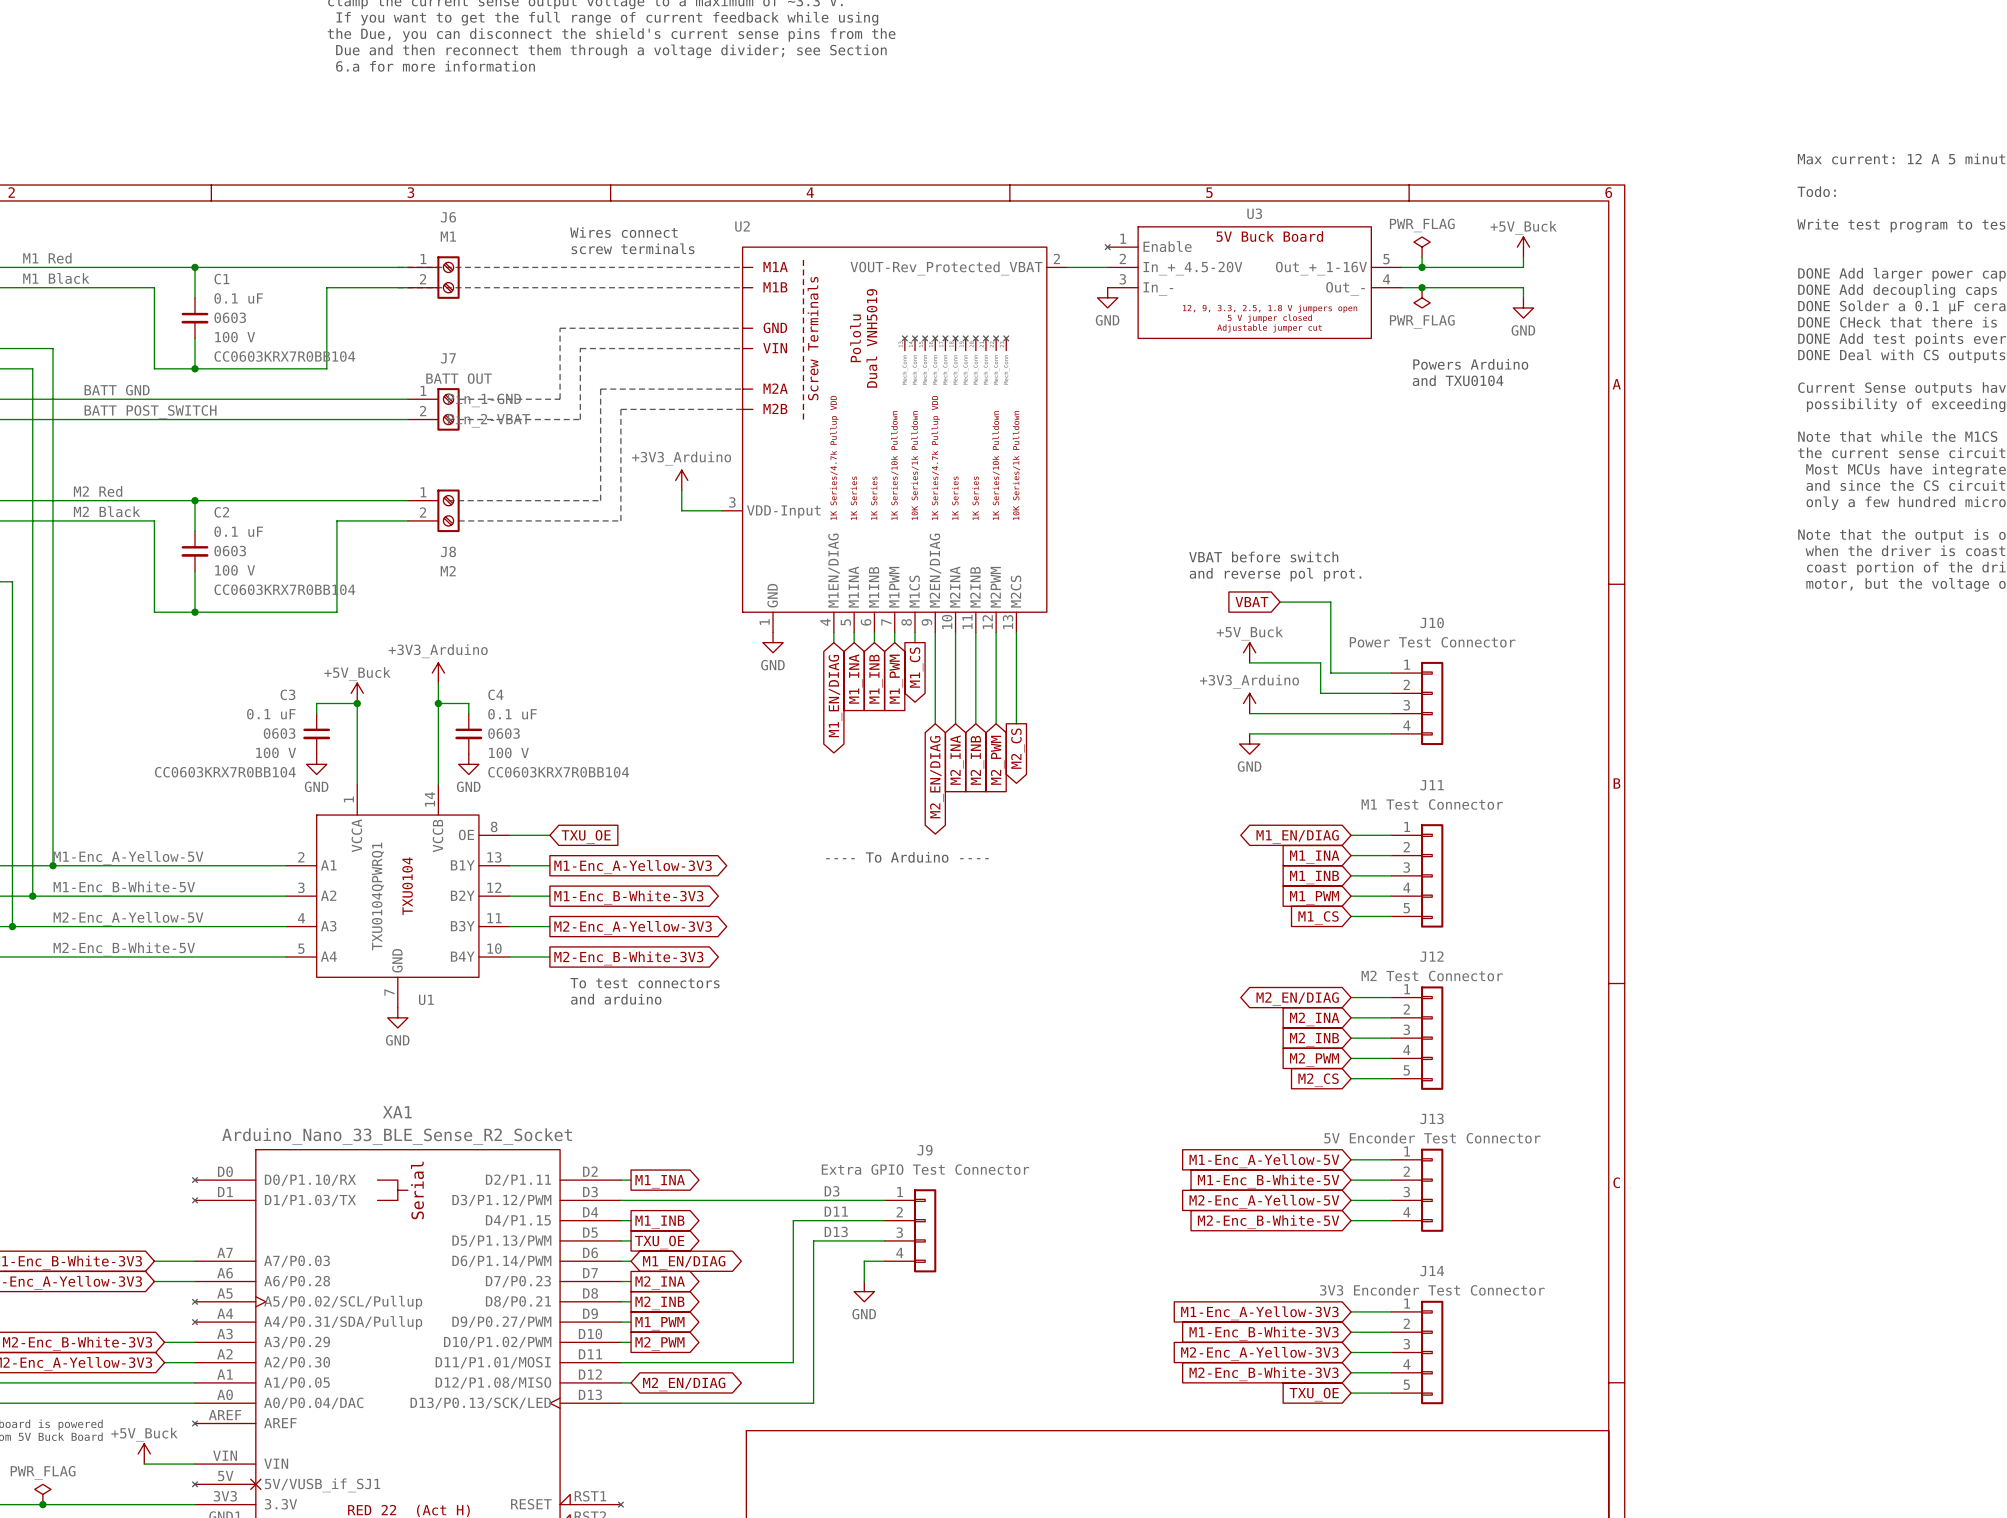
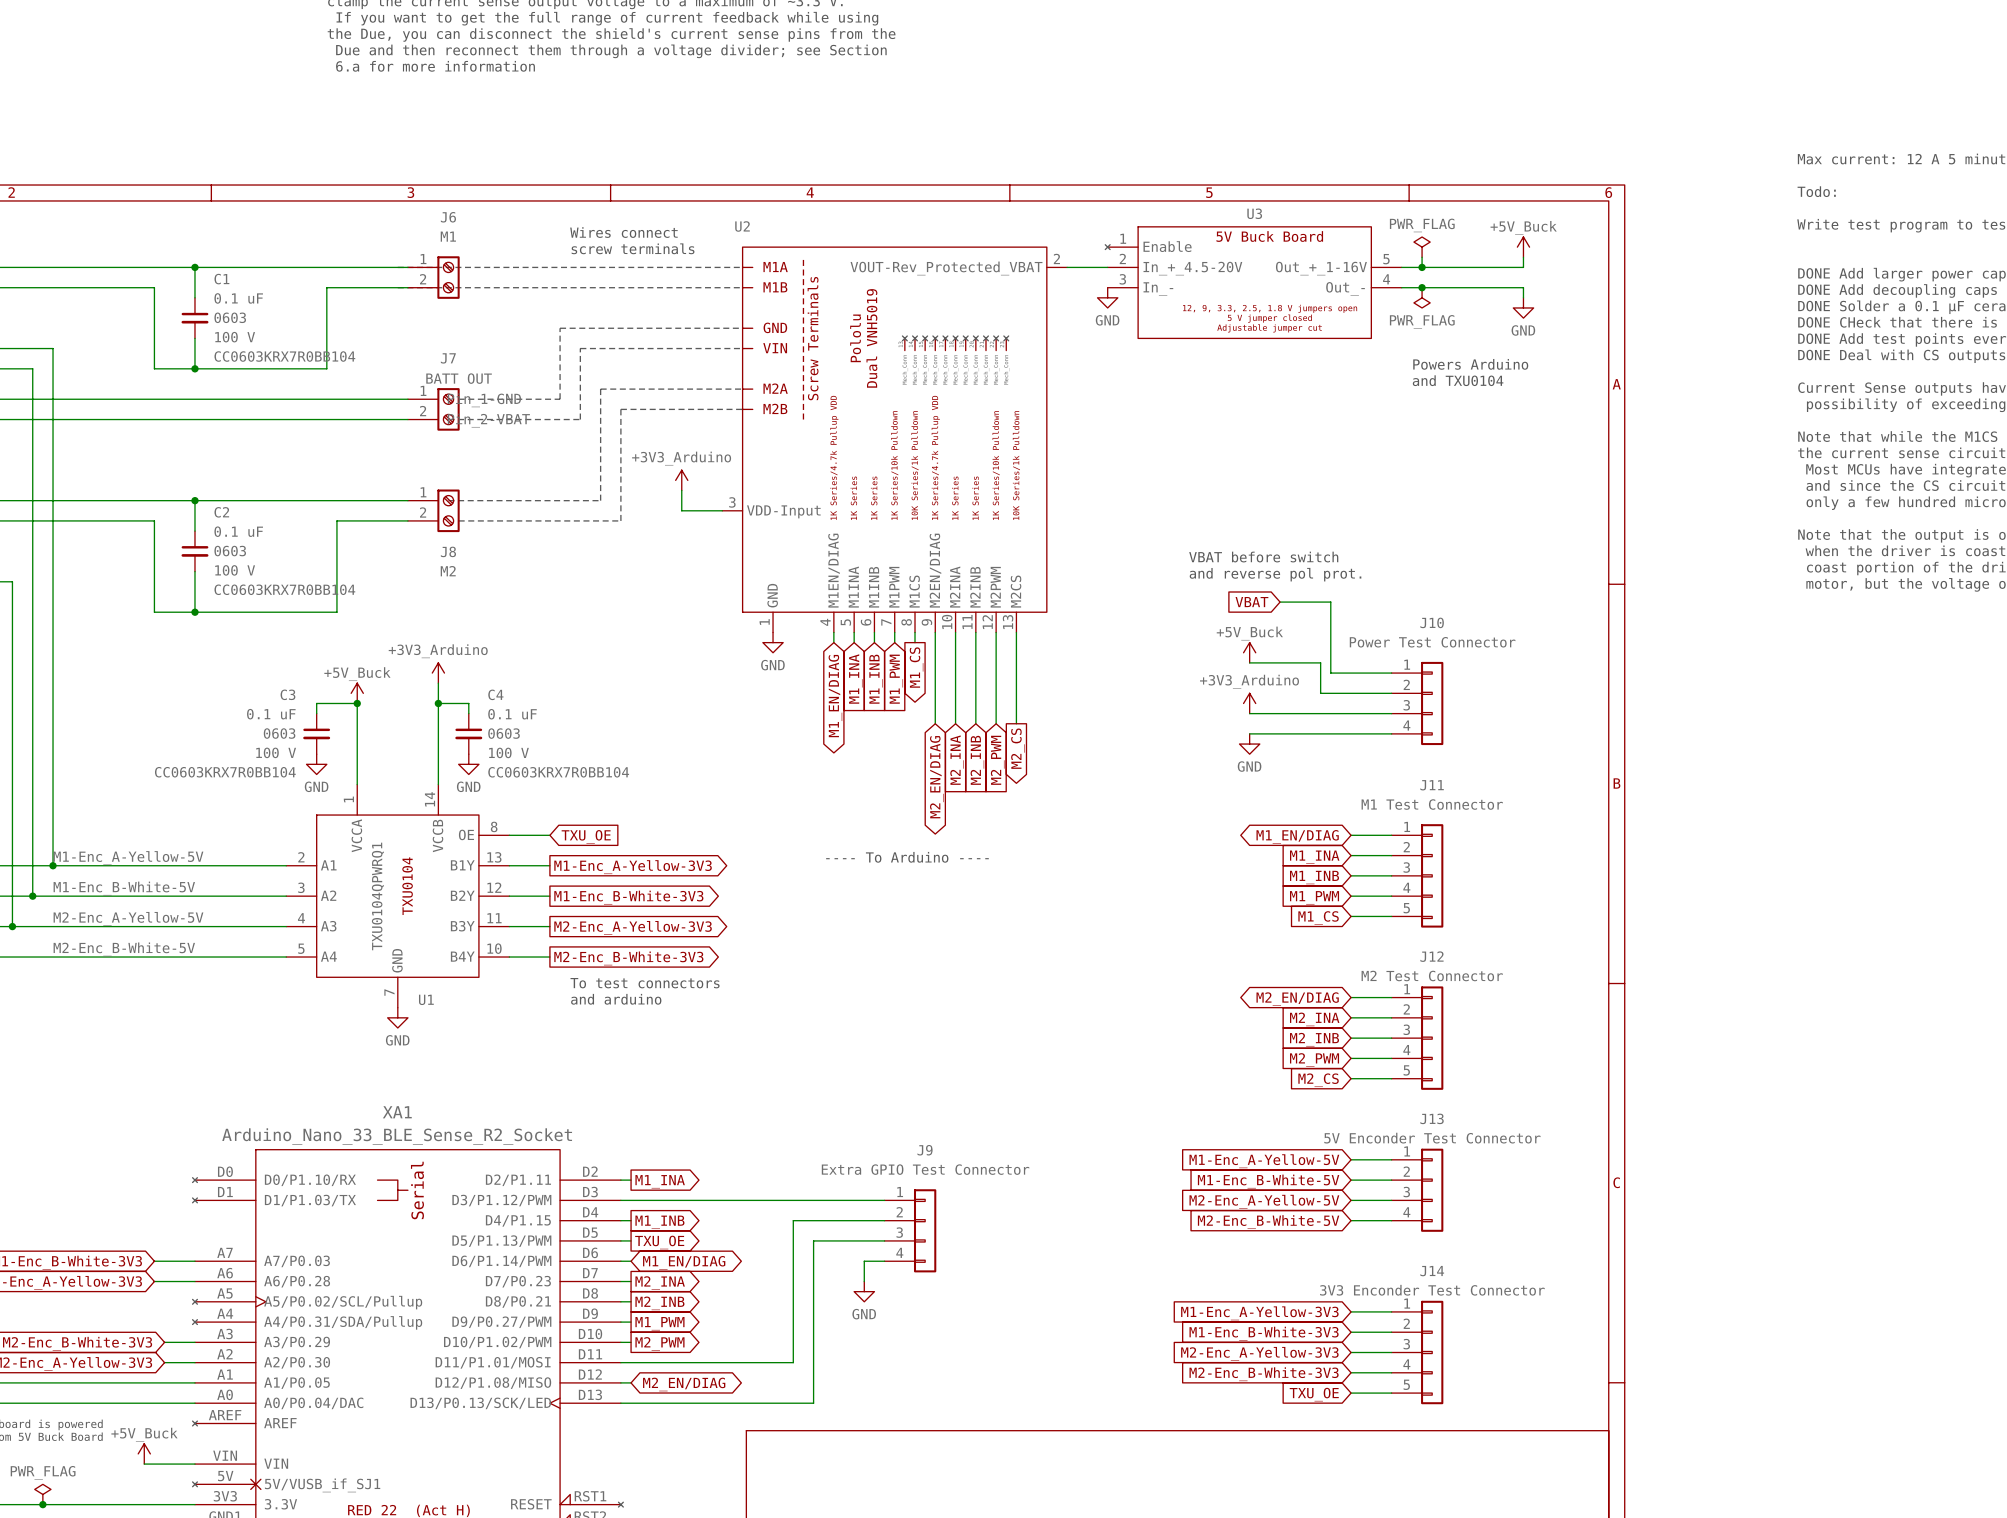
label: M1 Red (47, 258) -> none
label: M1 Black (56, 278) -> none
label: BATT GND (117, 390) -> none
label: BATT POST_SWITCH (150, 412) -> none
label: M2 Red (98, 491) -> none
label: M2 Black (106, 511) -> none
label: D3 (832, 1191) -> none
label: D11 (836, 1211) -> none
label: D13 (836, 1231) -> none

